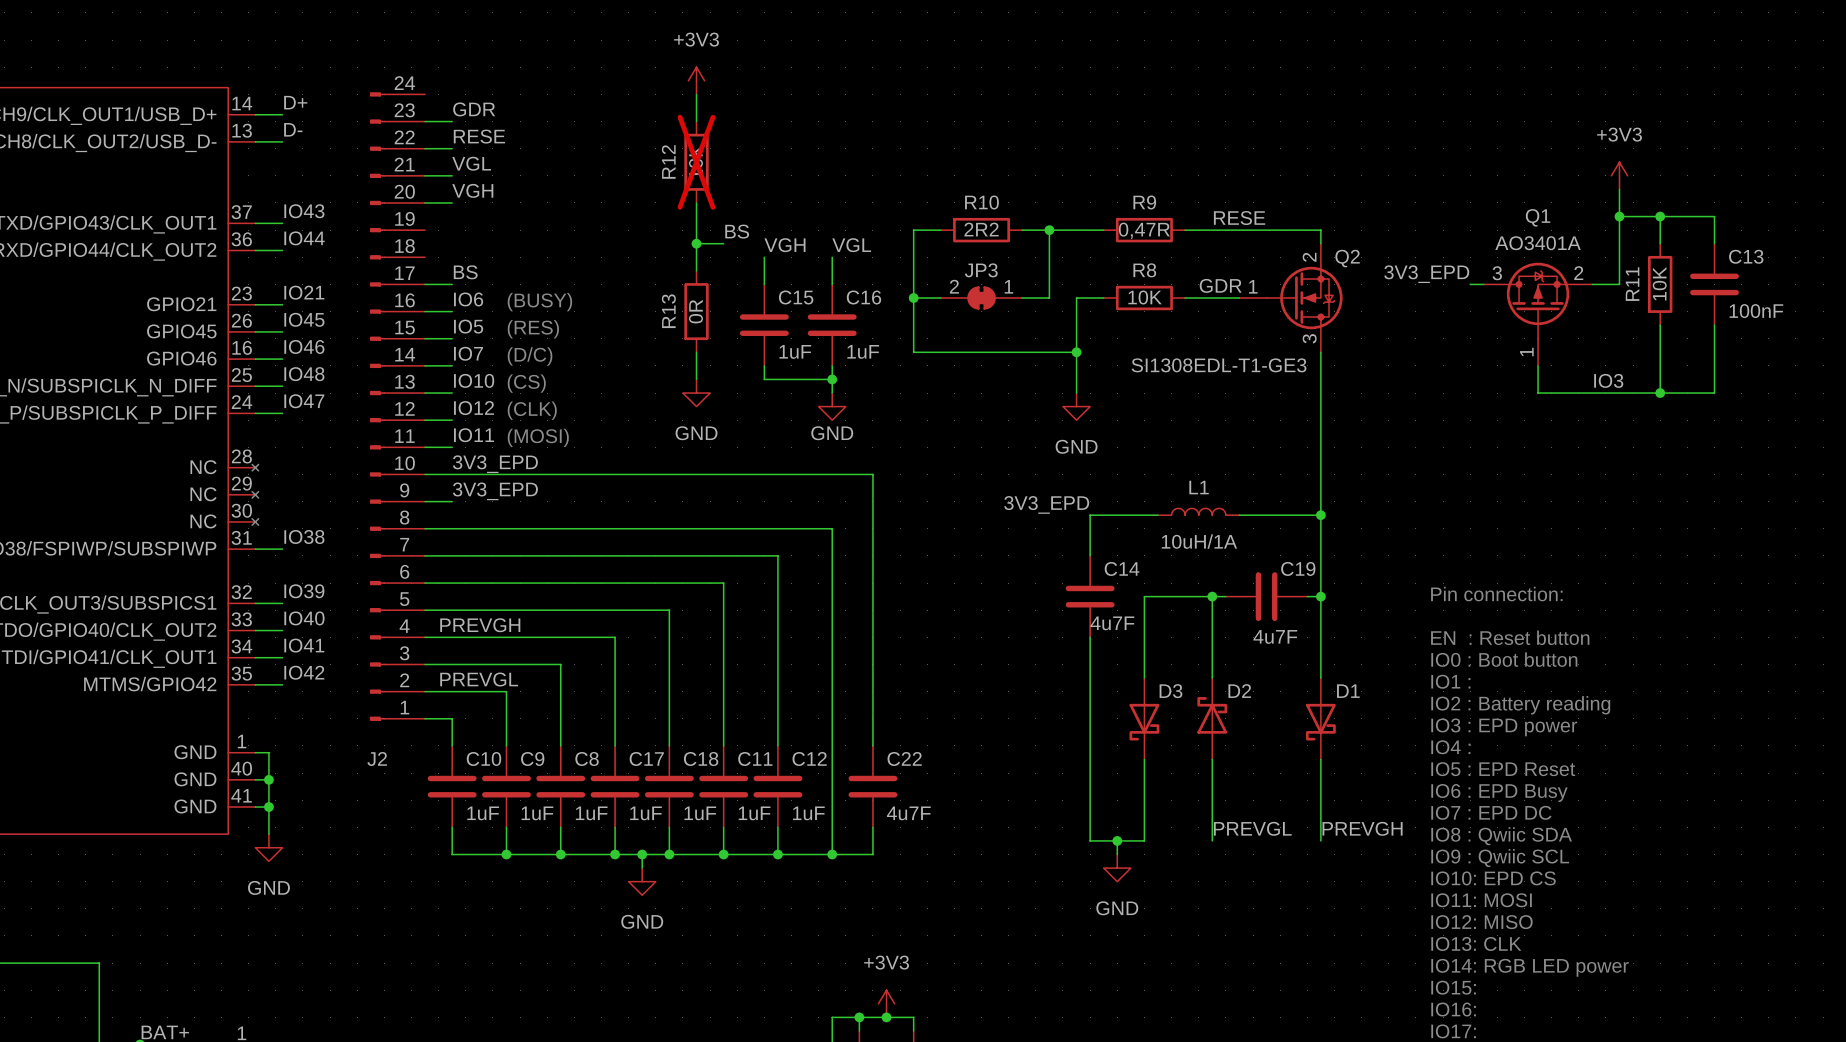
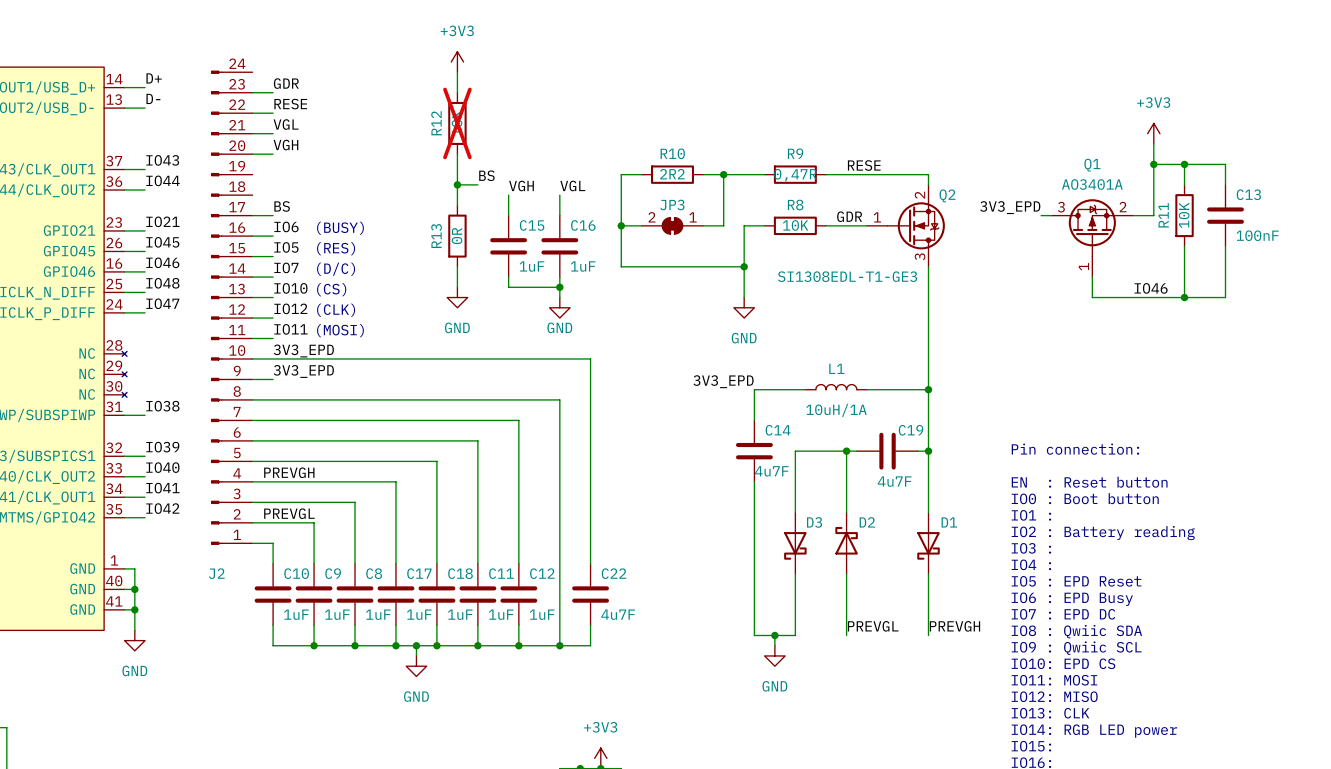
label: IO3 (1608, 380) -> IO46 (1151, 288)
text: IO3 : EPD power (1504, 727) -> IO3 : (1031, 548)

